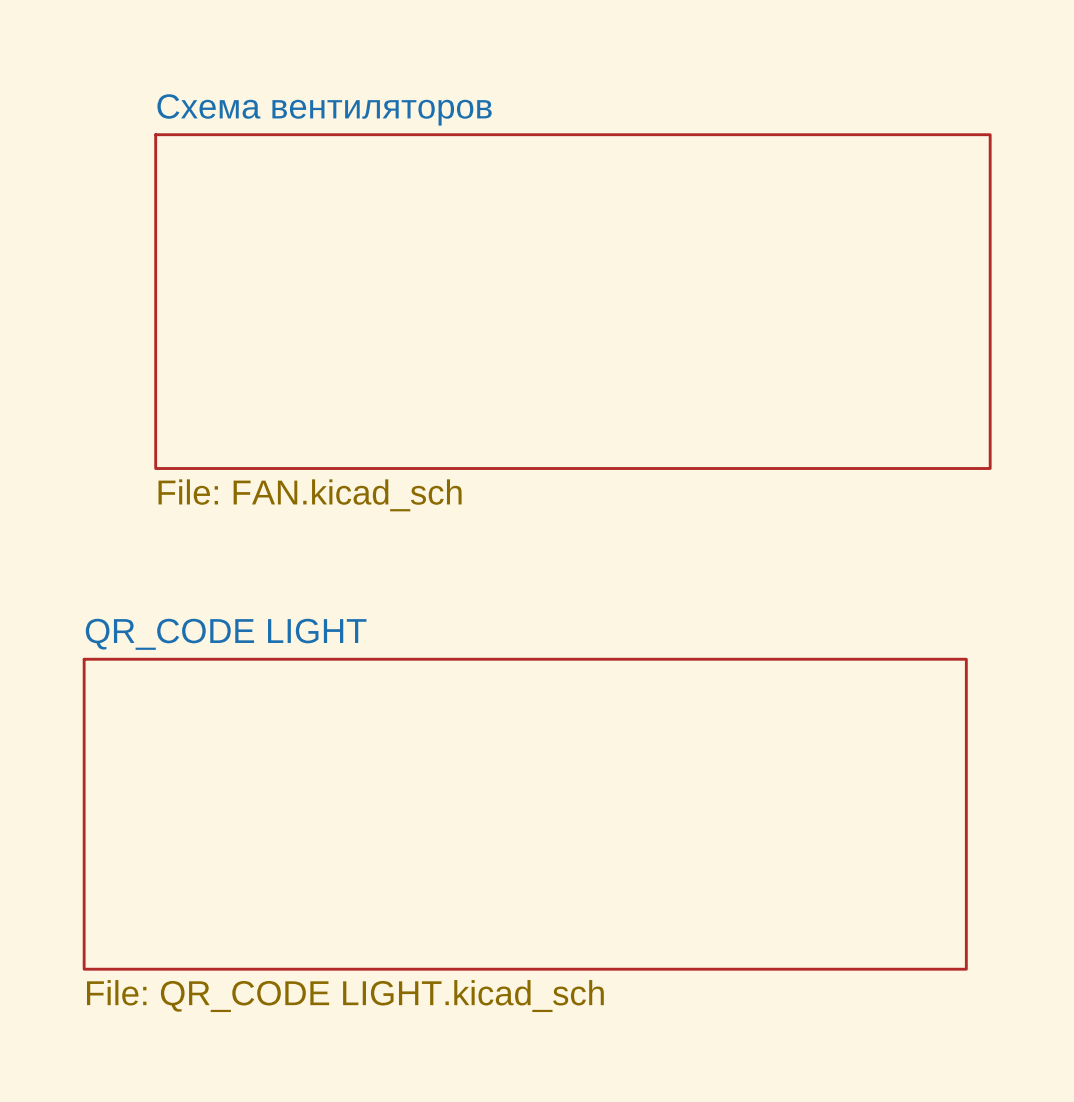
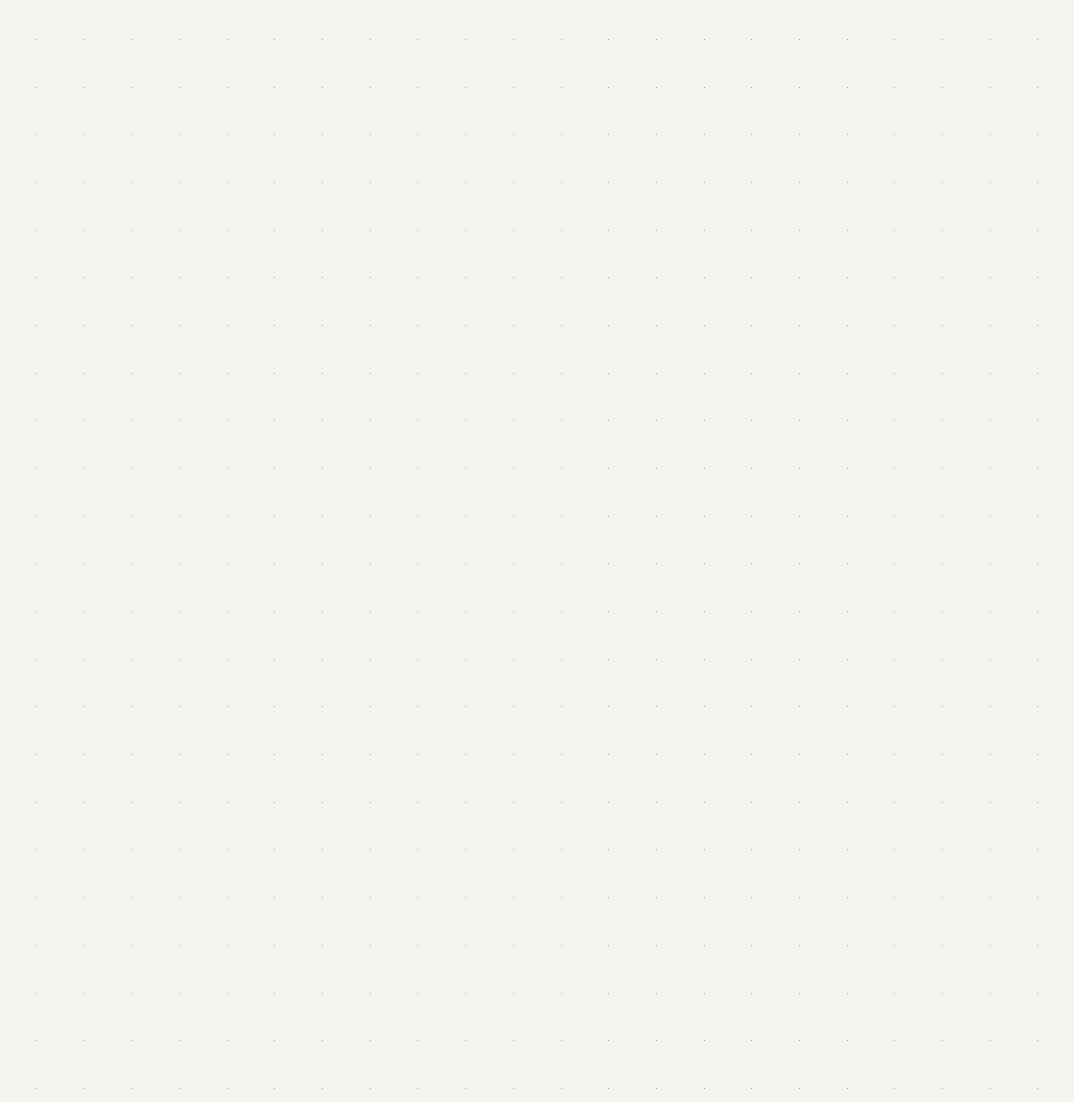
sheet Схема вентиляторов: File: FAN.kicad_sch (572, 301) -> none
sheet QR_CODE LIGHT: File: QR_CODE LIGHT.kicad_sch (525, 814) -> none

